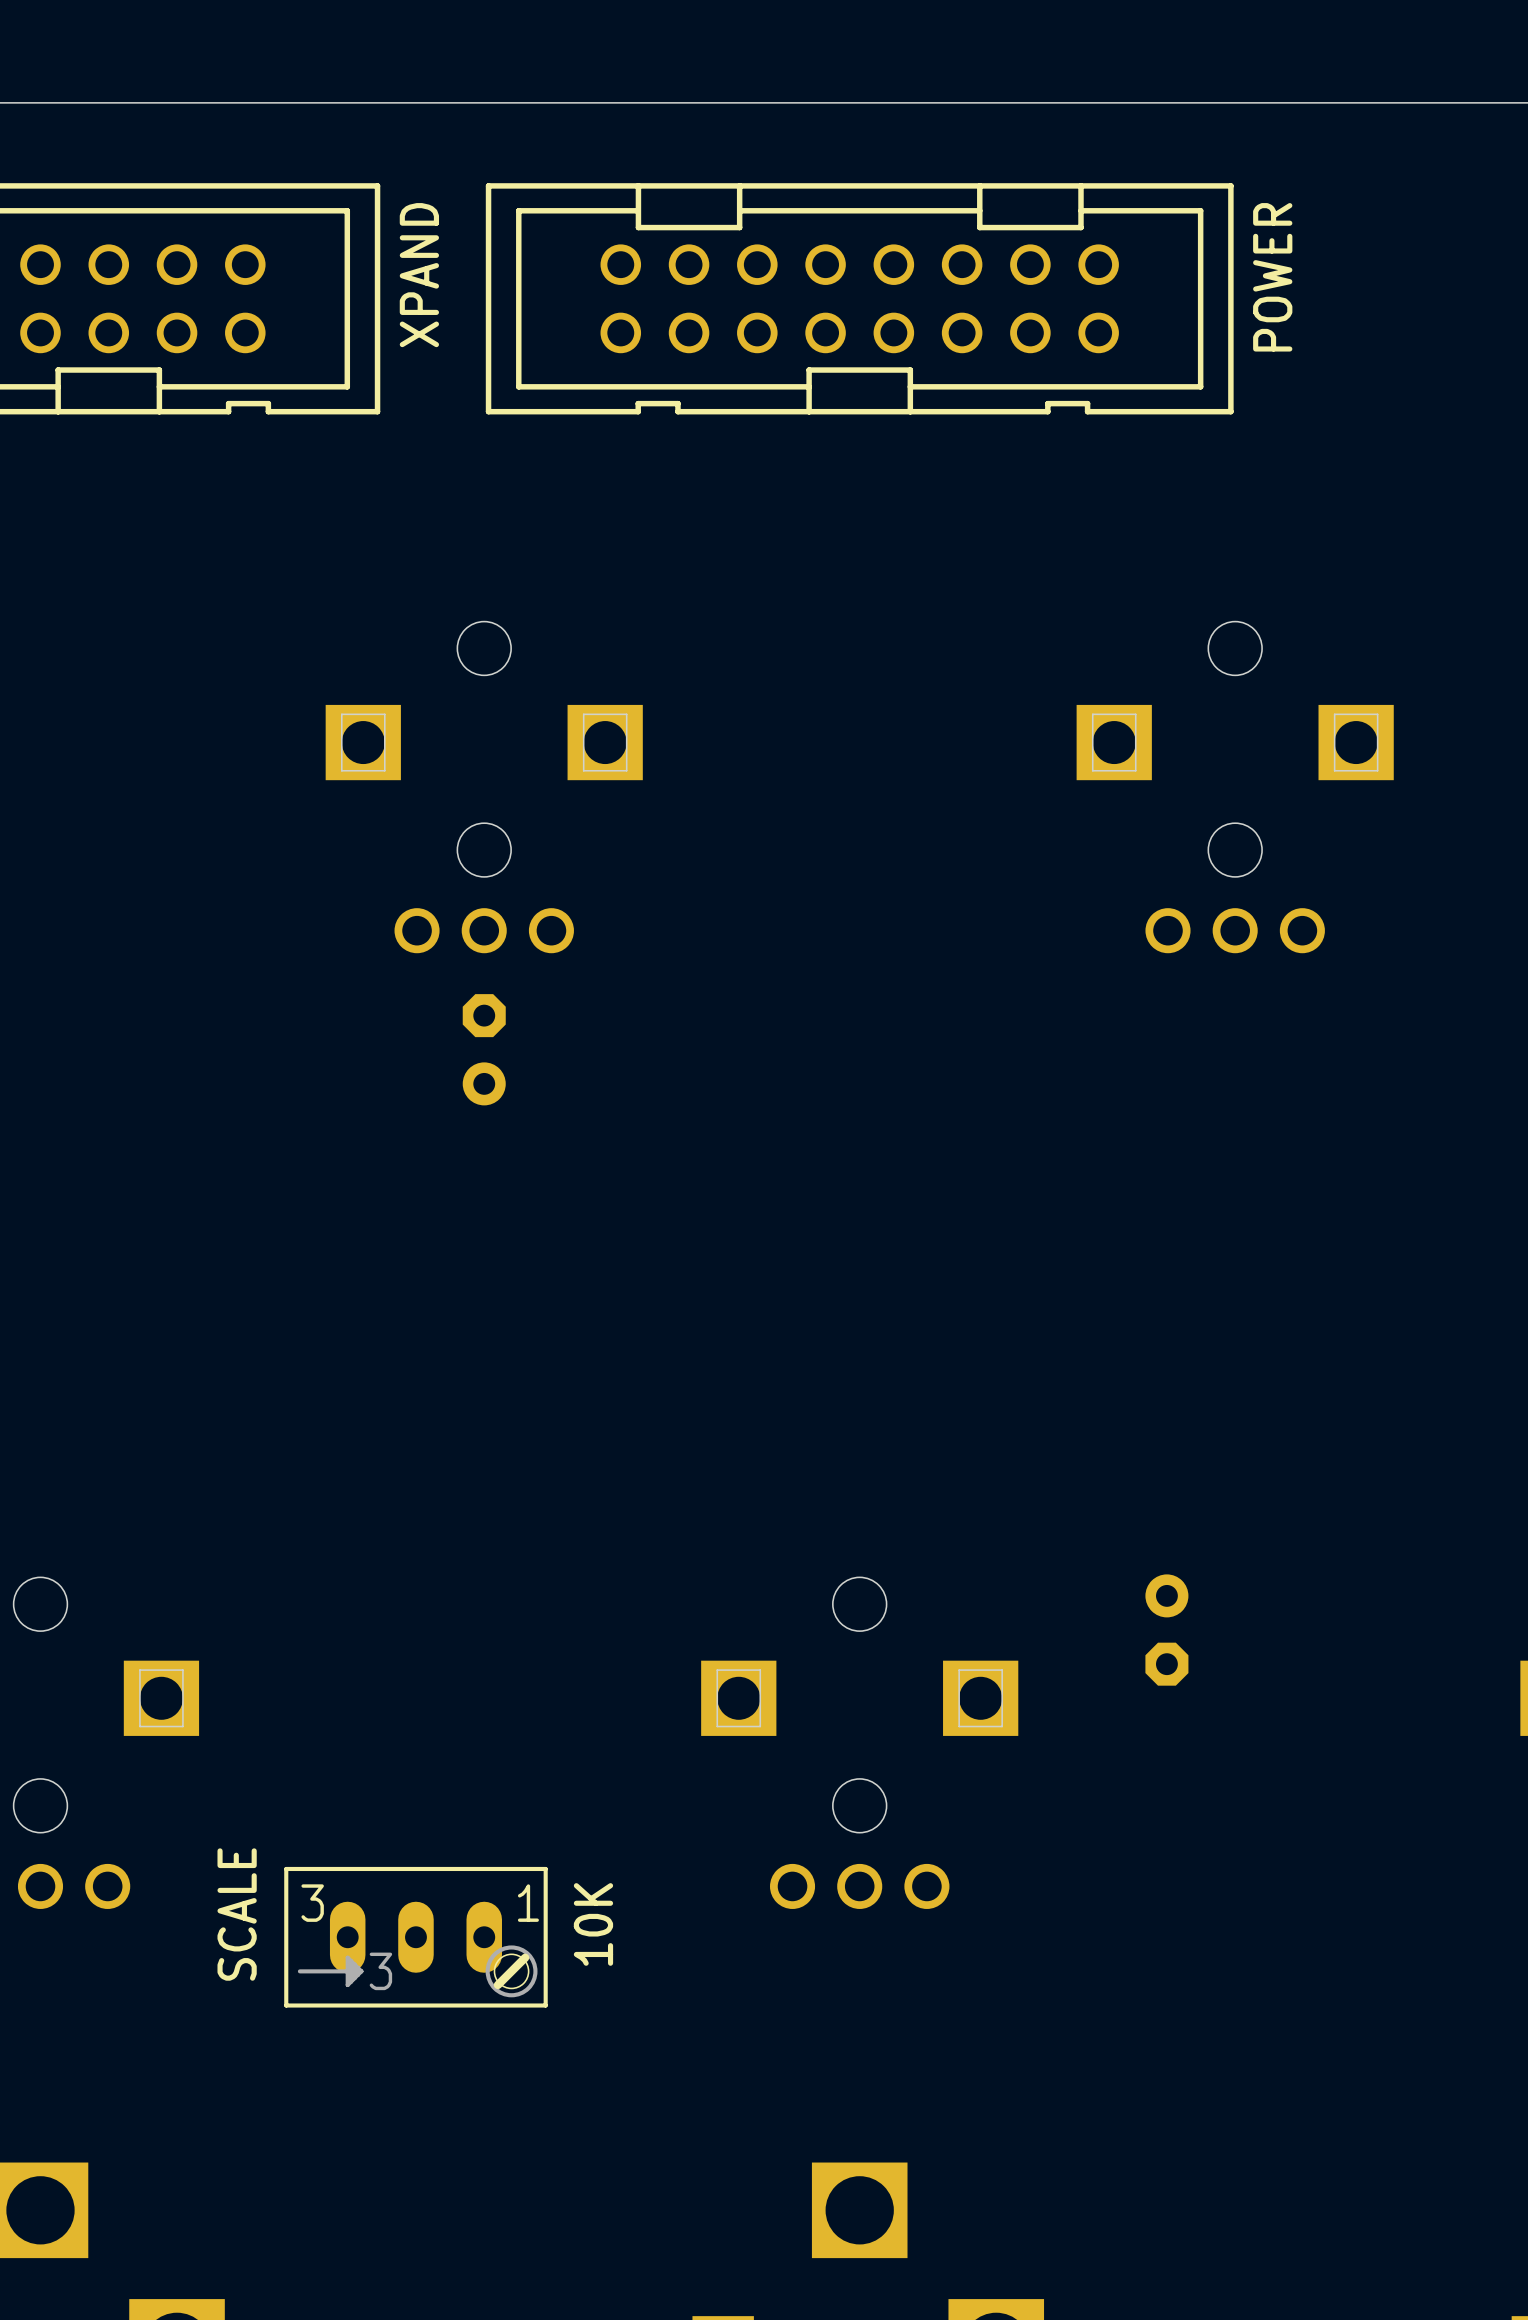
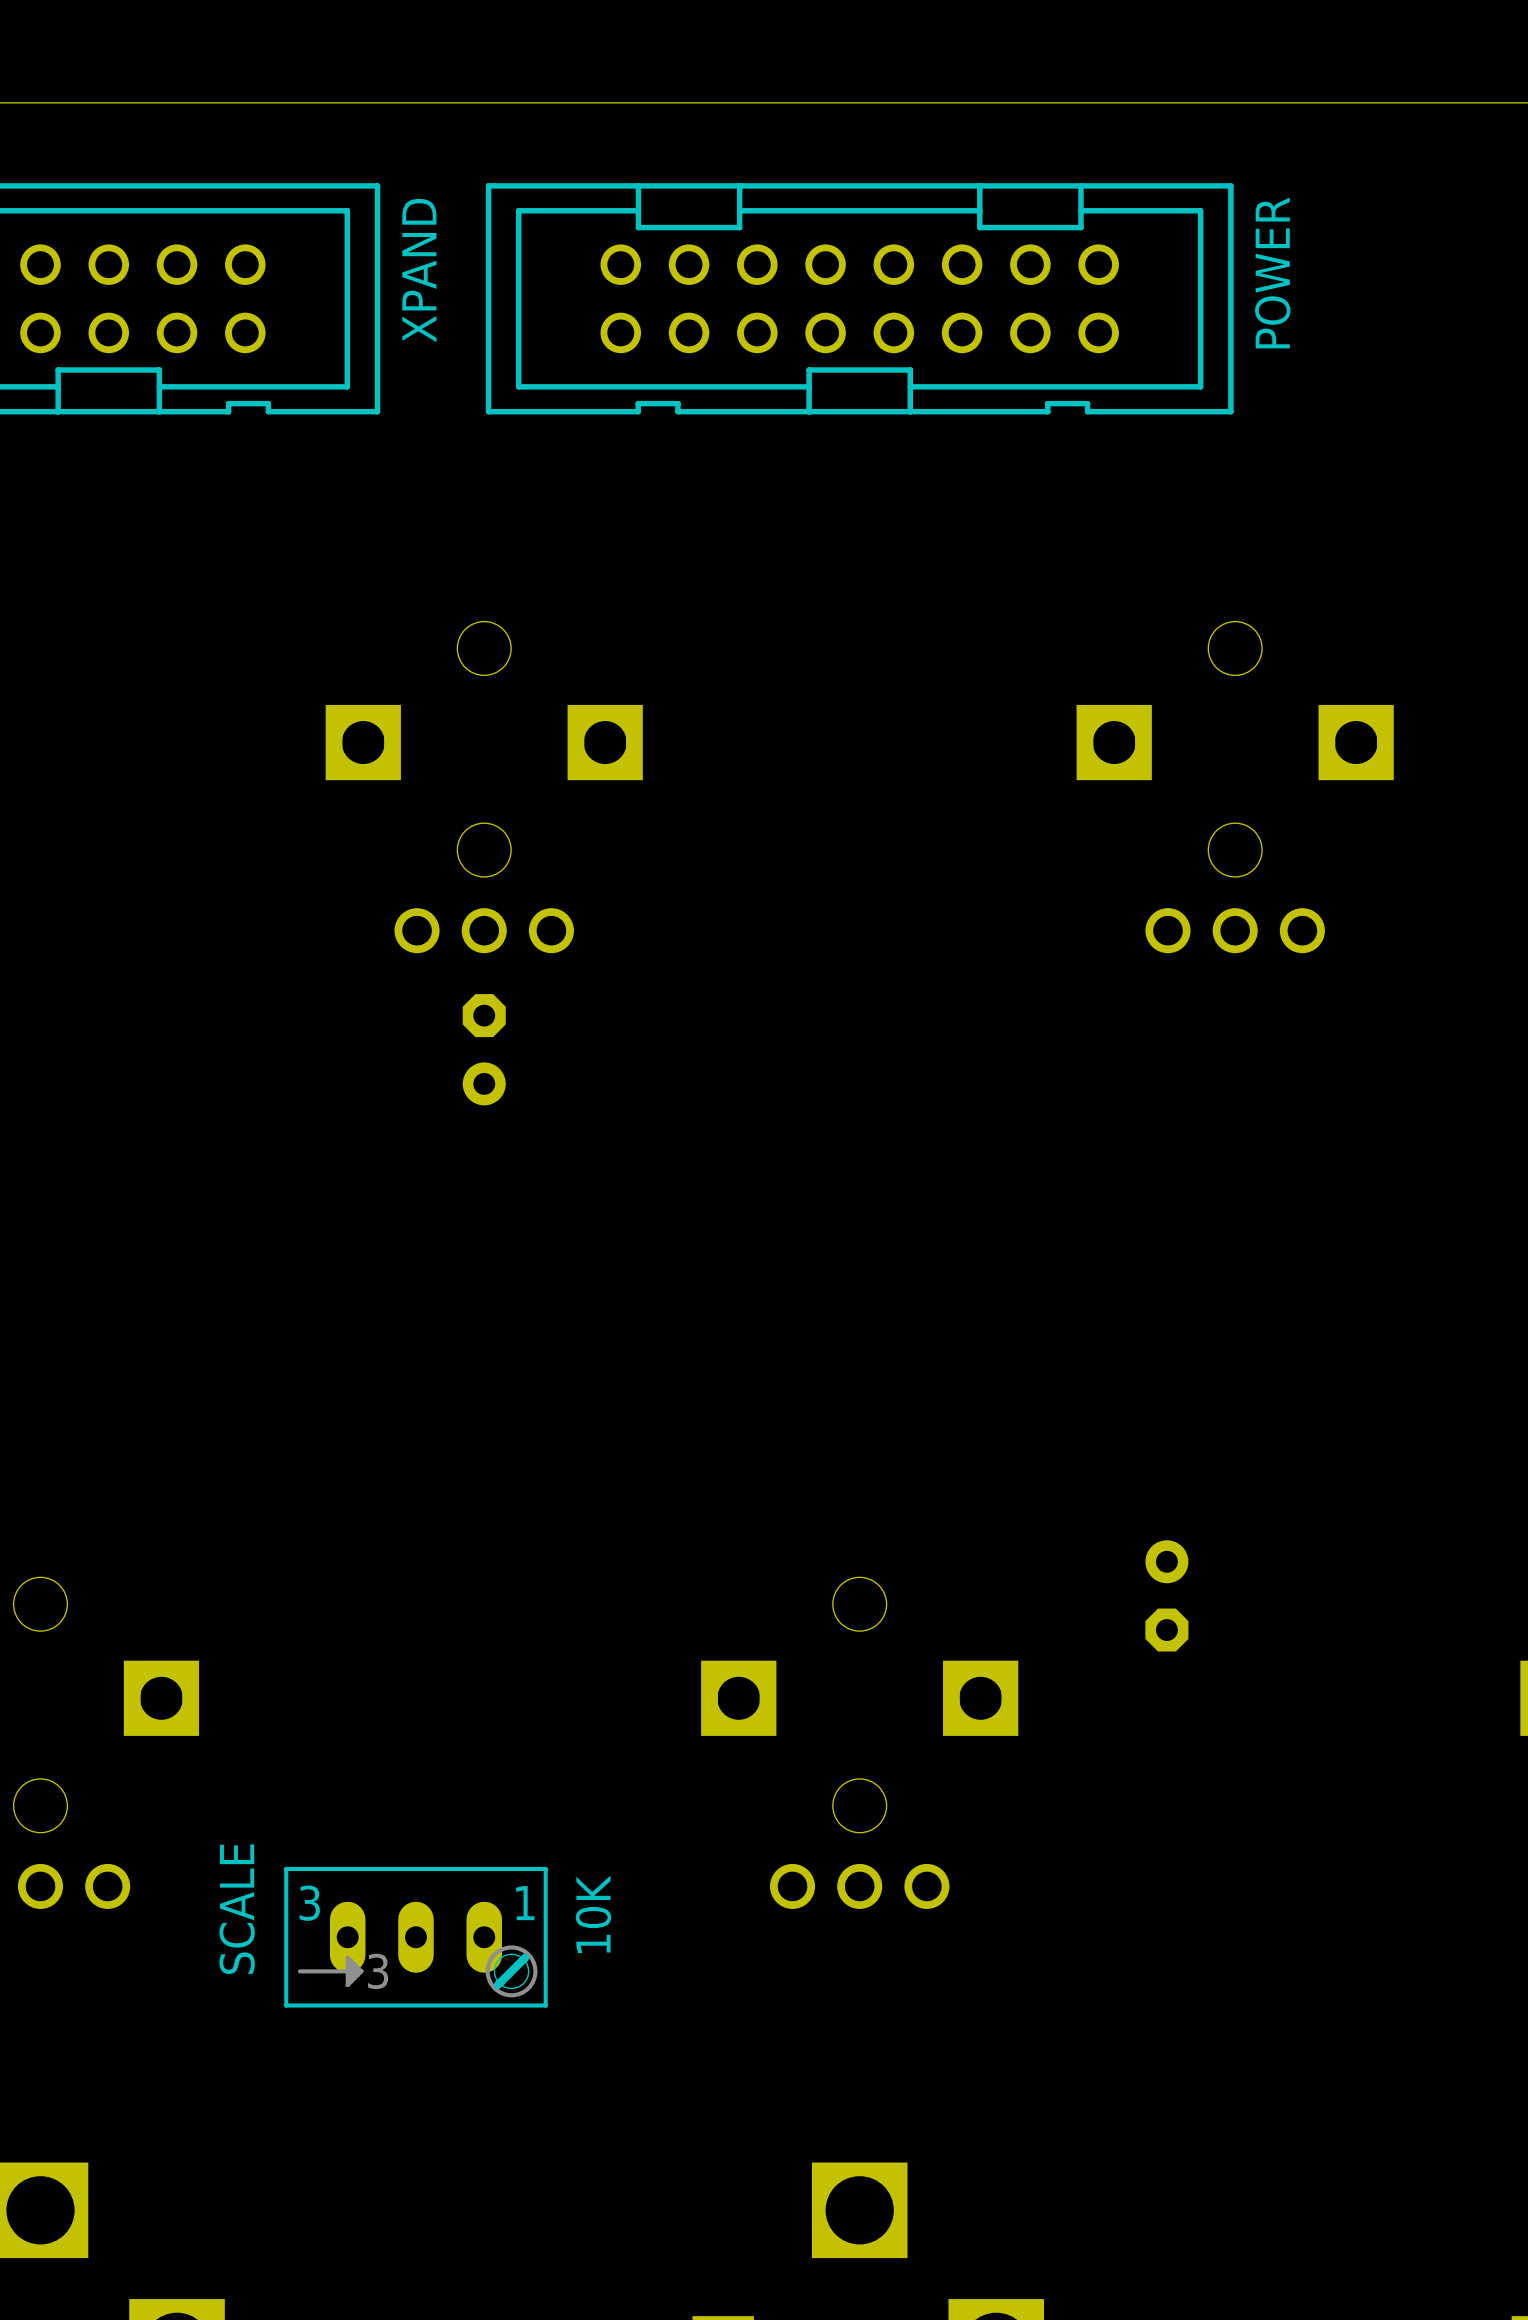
part position: (1166, 1630) -> (1166, 1595)

